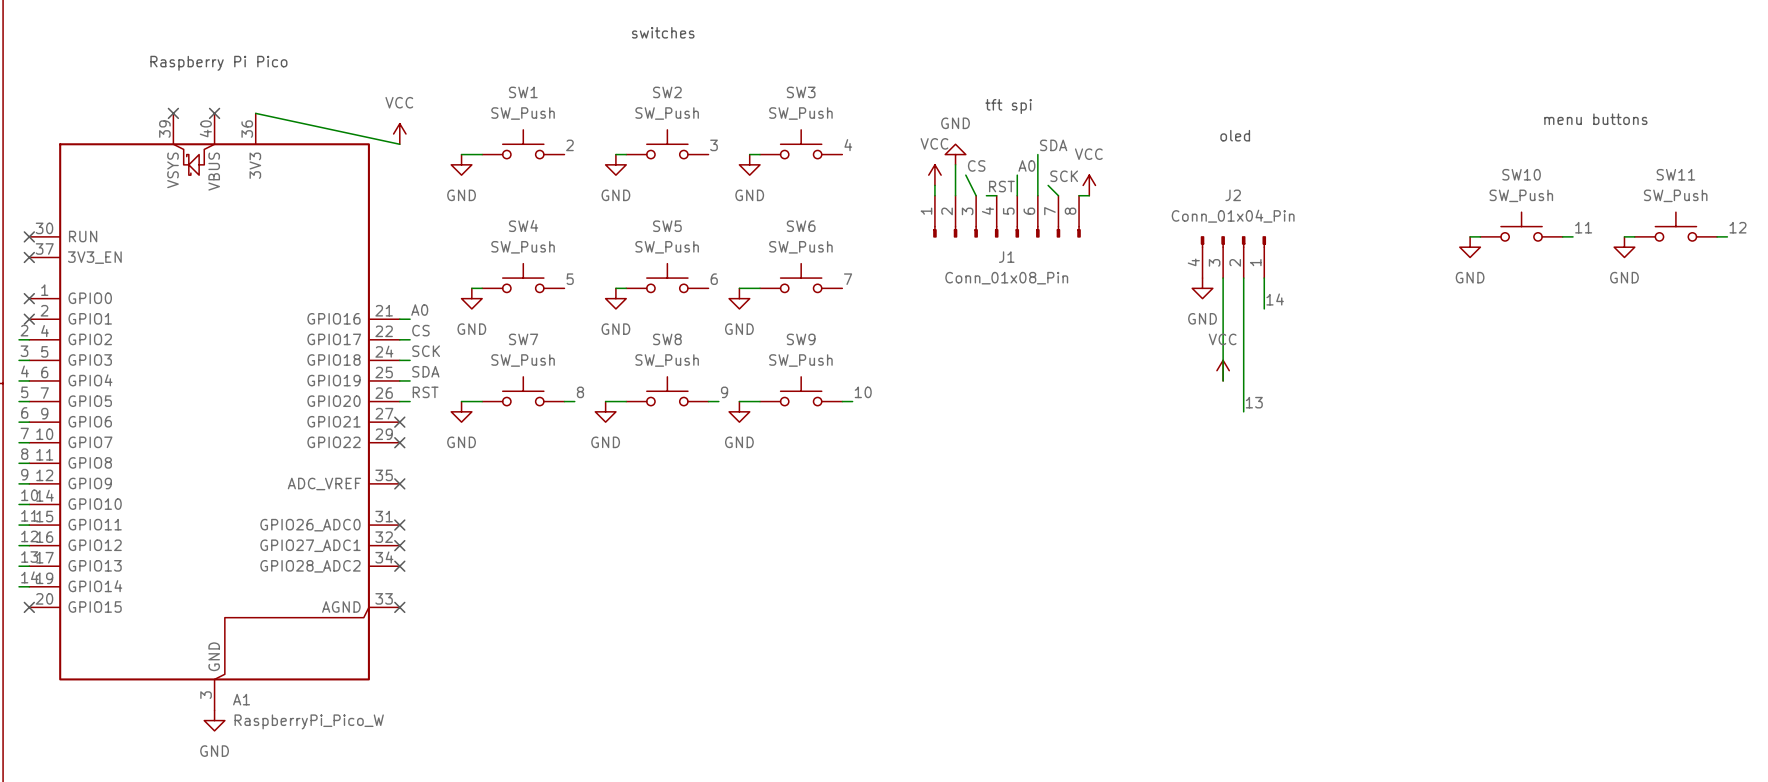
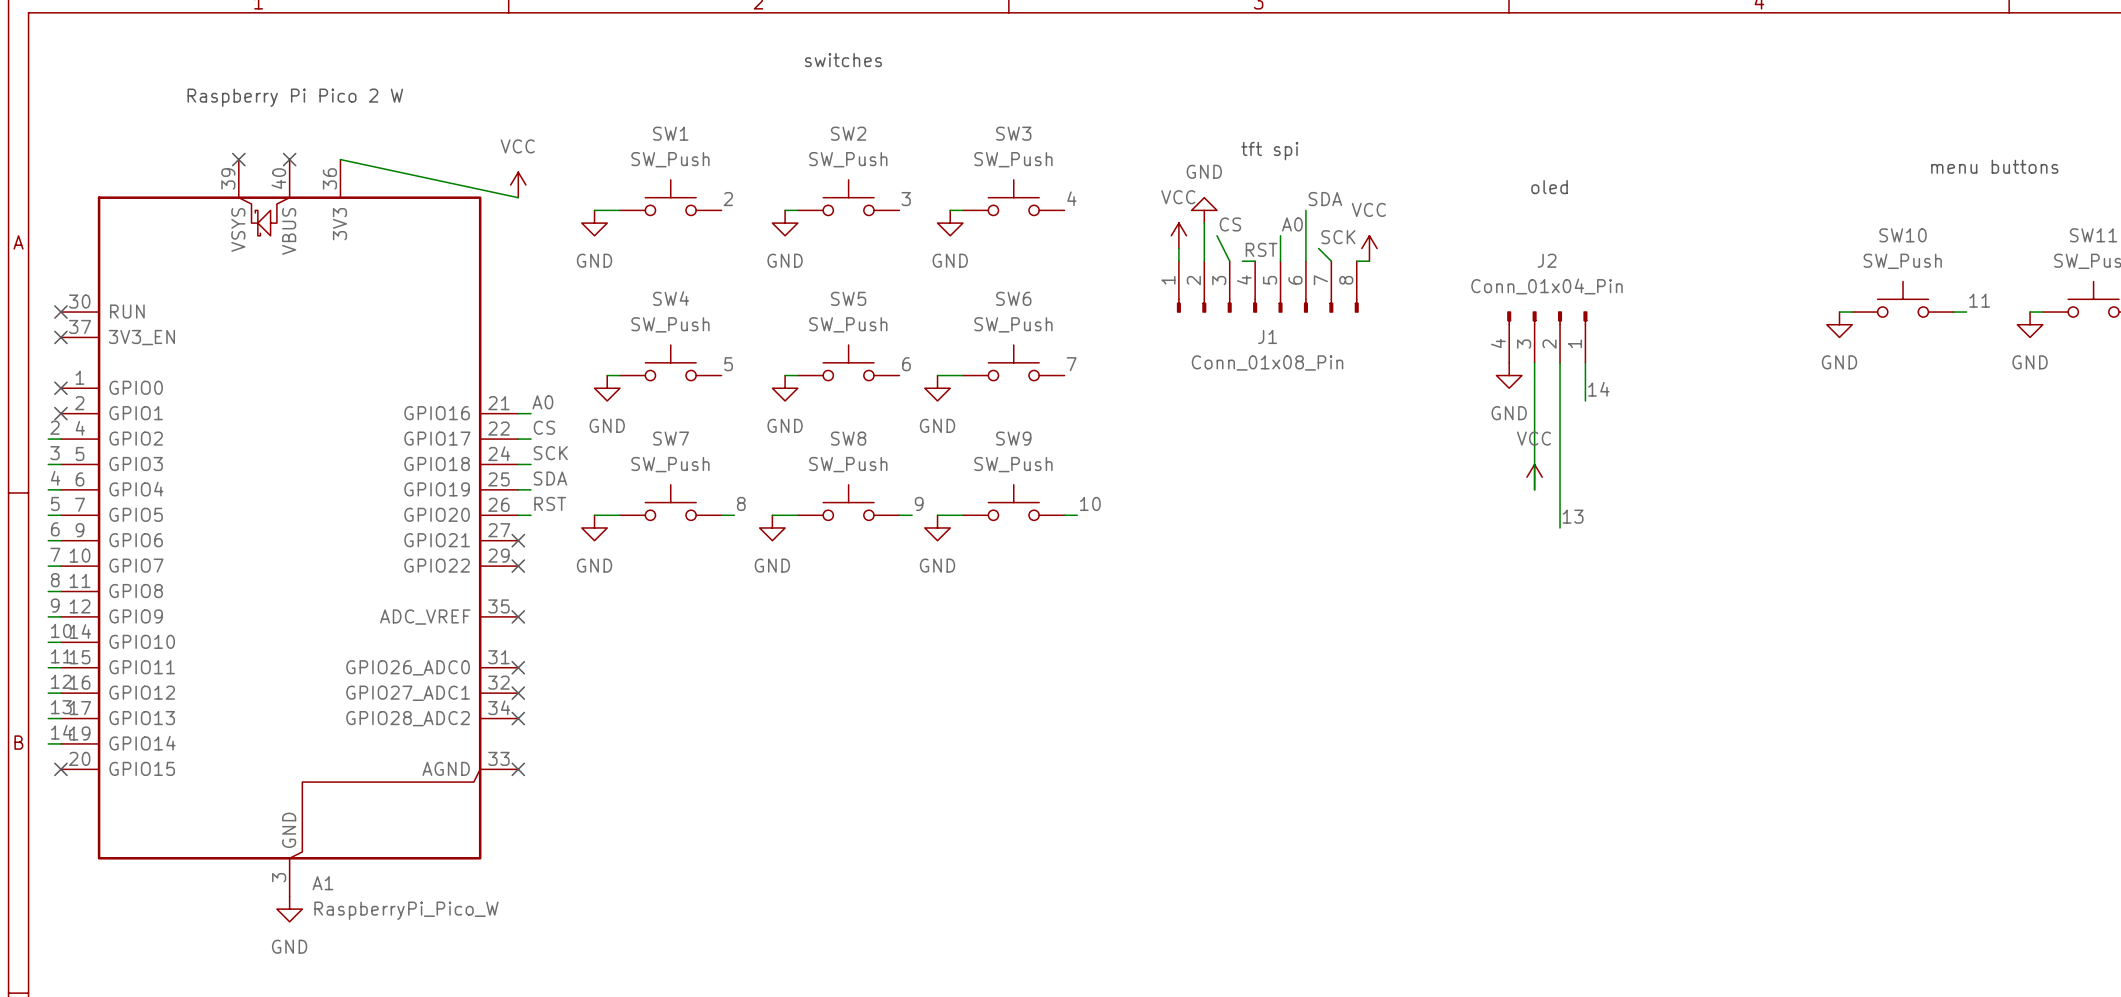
text: Raspberry Pi Pico (218, 63) -> Raspberry Pi Pico 2 W (295, 97)

